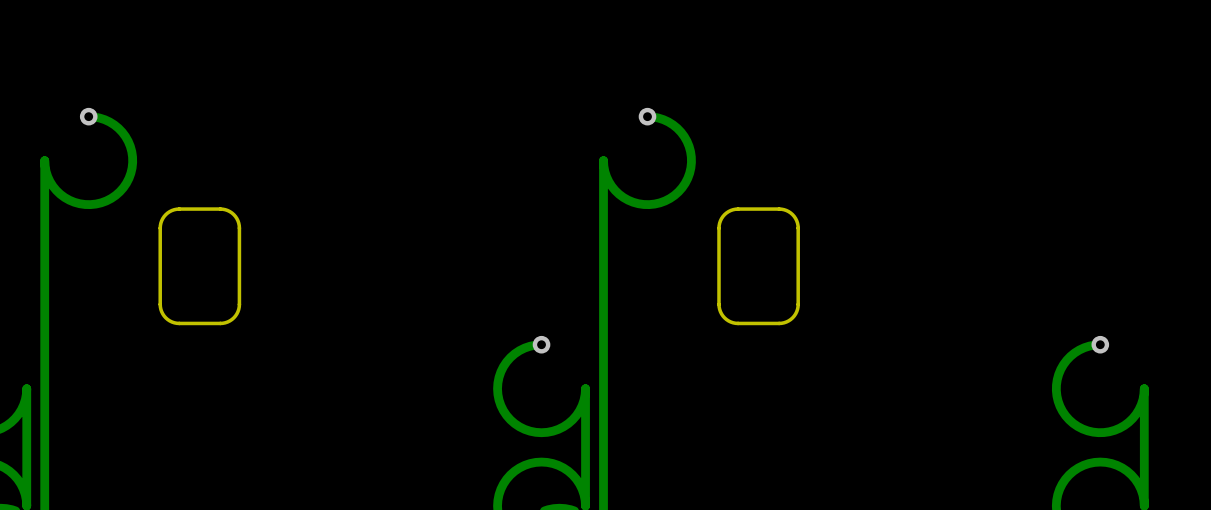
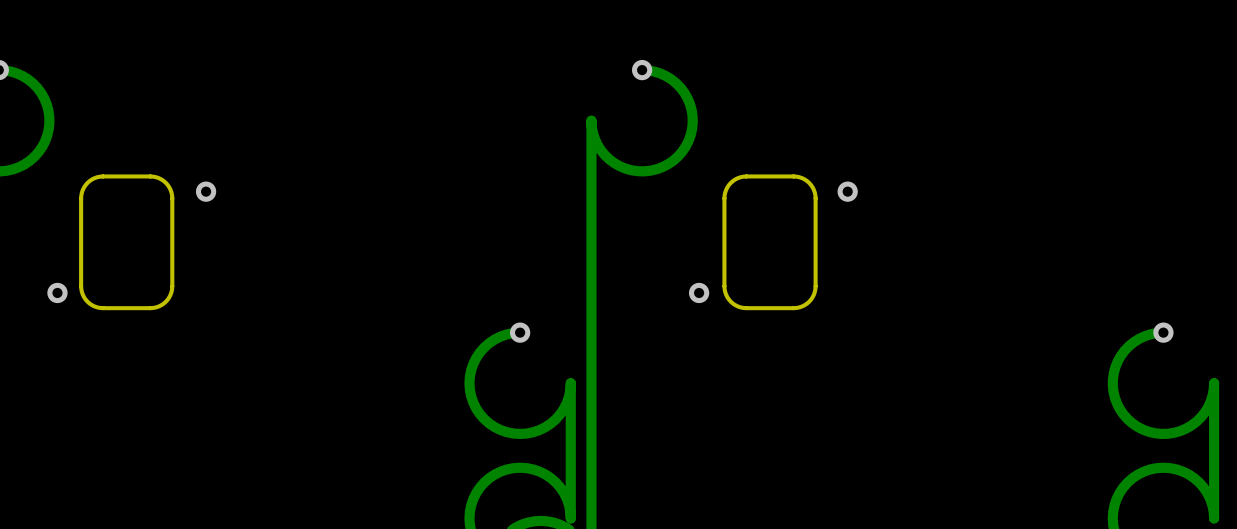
via: none -> (206, 191)
via: none -> (847, 191)
via: none -> (57, 292)
via: none -> (699, 292)

